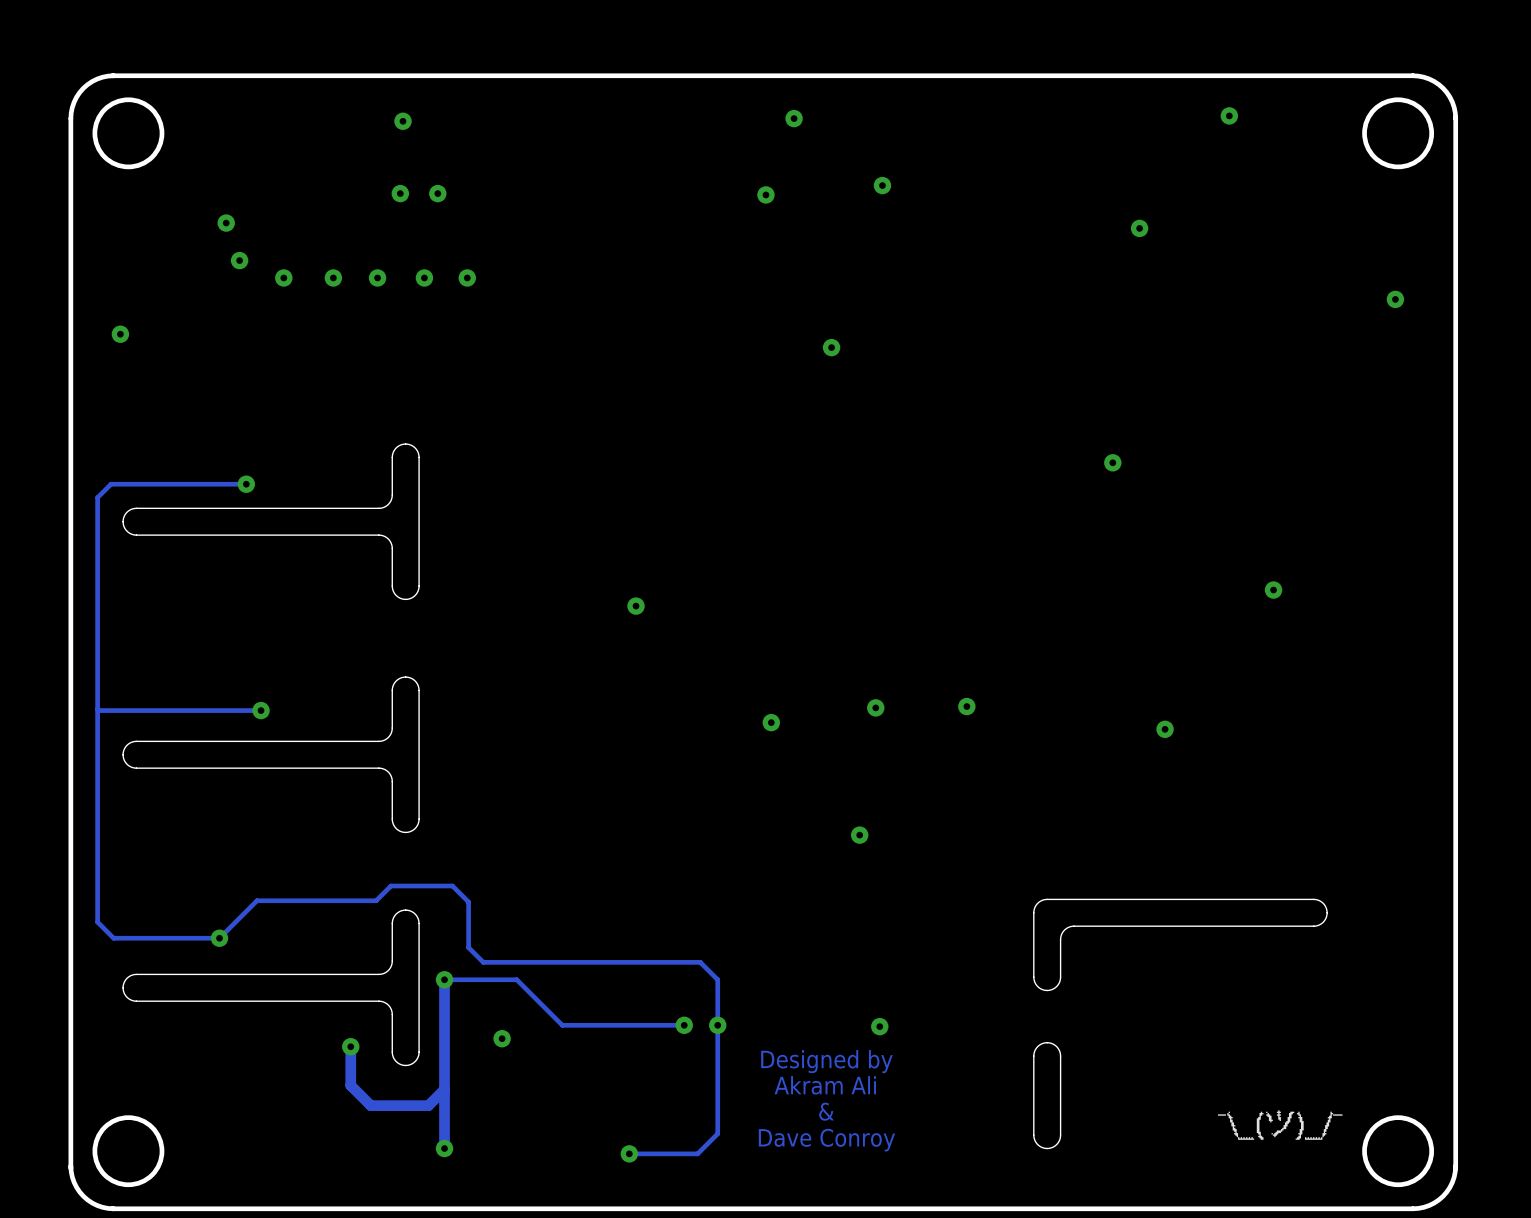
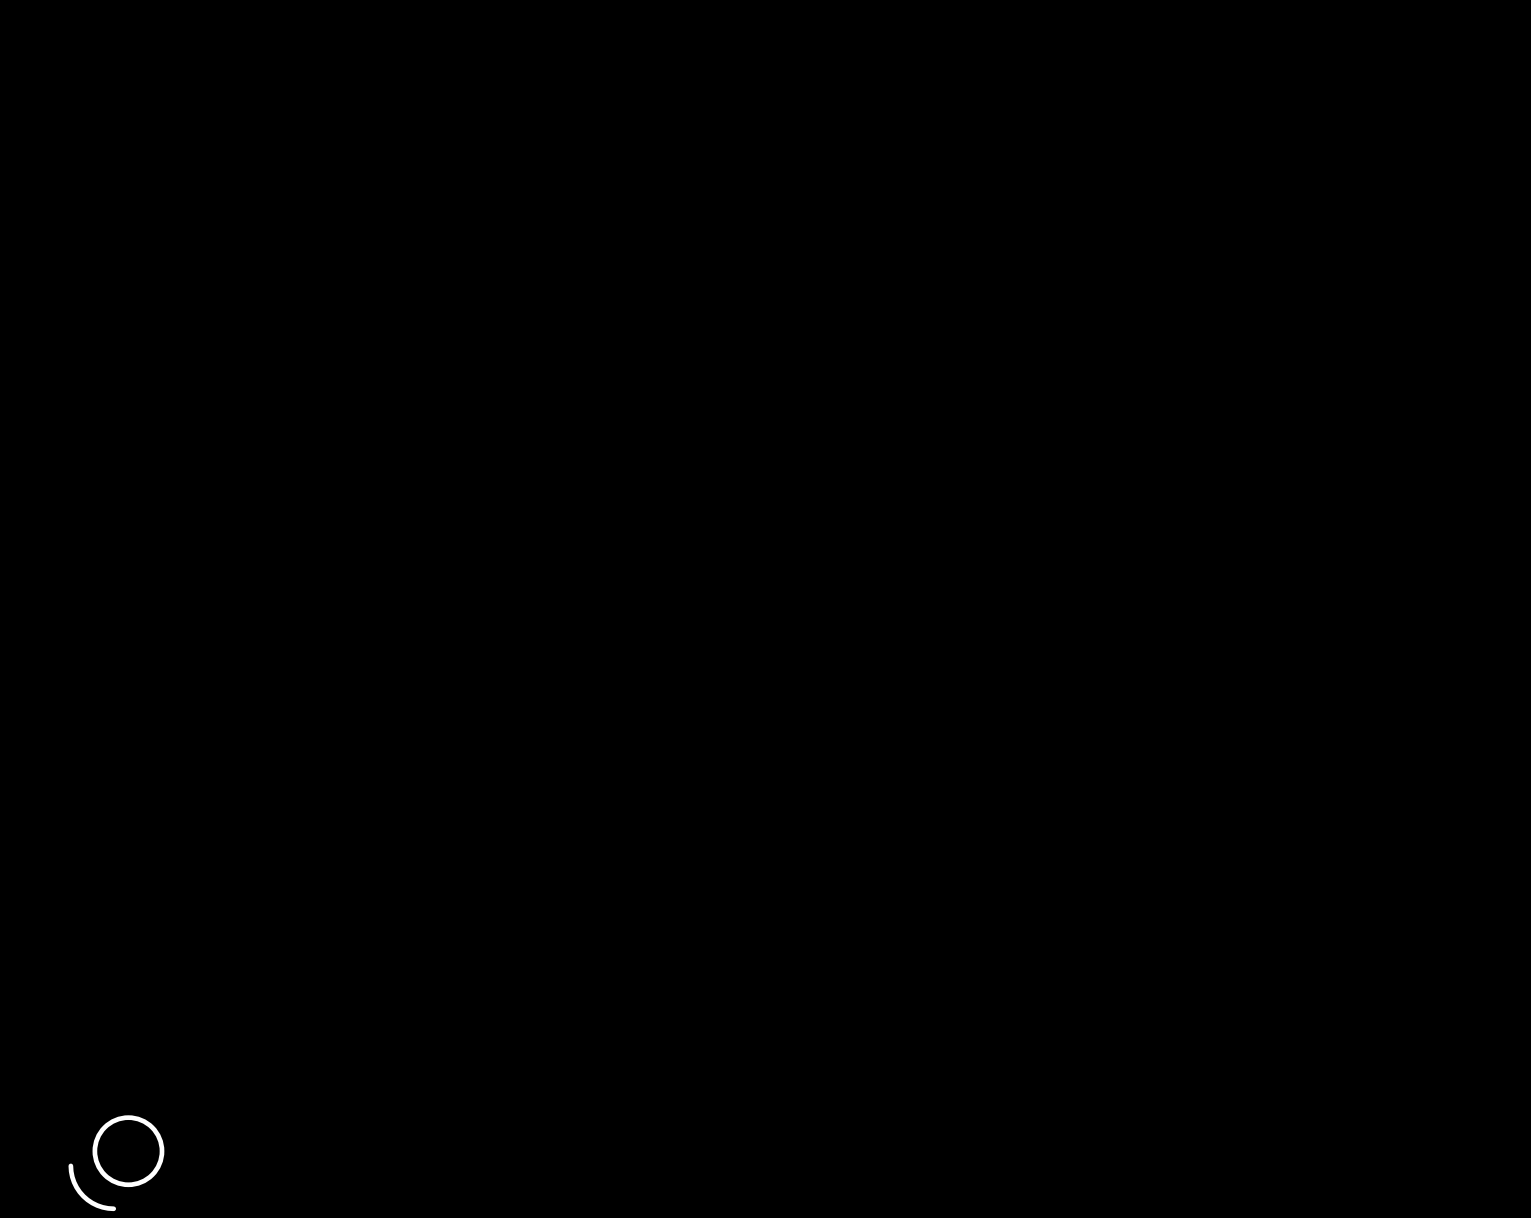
board edge: (112, 75) (1412, 75) (1429, 79) (1443, 88) (1452, 102) (1455, 118) -> none
board edge: (113, 75) (97, 79) (83, 88) (74, 102) (70, 118) (70, 1168) -> none
round board edge: [92, 97, 165, 170] -> none
round board edge: [1362, 97, 1435, 170] -> none
via: (1229, 115) -> none
board edge: (1455, 117) (1455, 1168) -> none
via: (794, 118) -> none
via: (403, 121) -> none
via: (882, 185) -> none
via: (400, 193) -> none
via: (437, 193) -> none
via: (765, 194) -> none
via: (226, 223) -> none
via: (1139, 228) -> none
via: (239, 260) -> none
via: (283, 277) -> none
via: (333, 277) -> none
via: (377, 277) -> none
via: (424, 277) -> none
via: (467, 277) -> none
via: (1395, 299) -> none
via: (120, 334) -> none
via: (831, 347) -> none
board edge: (405, 444) (415, 447) (419, 457) (418, 587) (416, 594) (409, 598) (400, 598) (393, 591) (392, 546) (389, 540) (382, 535) (136, 535) (128, 532) (123, 525) (125, 513) (134, 508) (382, 507) (389, 503) (392, 496) (393, 452) (397, 446) (405, 444) -> none
via: (1112, 462) -> none
track: (246, 484) (111, 484) (97, 497) (97, 922) (113, 938) (219, 938) (257, 900) (376, 900) (390, 886) (452, 886) (468, 902) (468, 947) (483, 962) (700, 962) (717, 979) (717, 1133) (697, 1153) (629, 1153) -> none
via: (246, 484) -> none
via: (1273, 590) -> none
via: (636, 606) -> none
board edge: (405, 677) (415, 681) (419, 690) (418, 820) (416, 827) (409, 831) (400, 831) (393, 824) (392, 779) (389, 773) (382, 768) (136, 768) (128, 765) (123, 758) (125, 746) (134, 741) (382, 740) (389, 736) (392, 729) (393, 685) (397, 679) (405, 677) -> none
via: (966, 706) -> none
via: (875, 707) -> none
track: (97, 709) (261, 710) -> none
via: (261, 710) -> none
via: (771, 722) -> none
via: (1165, 729) -> none
via: (859, 835) -> none
board edge: (1313, 899) (1043, 899) (1036, 904) (1033, 911) (1034, 980) (1039, 987) (1045, 990) (1052, 989) (1057, 985) (1060, 978) (1061, 936) (1064, 930) (1070, 926) (1315, 926) (1324, 920) (1327, 911) (1321, 902) (1313, 899) -> none
board edge: (405, 910) (415, 914) (419, 923) (418, 1053) (416, 1060) (409, 1065) (400, 1064) (393, 1057) (392, 1012) (389, 1006) (382, 1001) (136, 1001) (128, 998) (123, 991) (125, 979) (134, 974) (382, 973) (389, 969) (392, 962) (393, 918) (397, 912) (405, 910) -> none
via: (219, 938) -> none
via: (444, 979) -> none
track: (684, 1025) (562, 1025) (516, 979) (444, 979) (444, 1148) -> none
via: (684, 1025) -> none
via: (717, 1025) -> none
via: (879, 1026) -> none
via: (502, 1038) -> none
board edge: (1047, 1042) (1056, 1046) (1060, 1056) (1060, 1136) (1055, 1145) (1047, 1148) (1037, 1144) (1033, 1135) (1033, 1054) (1039, 1045) (1047, 1042) -> none
track: (350, 1046) (350, 1085) (370, 1105) (428, 1105) (444, 1089) -> none
via: (350, 1046) -> none
text: Designed by (826, 1061) -> none
text: Akram Ali (825, 1085) -> none
drawing: [1217, 1110, 1343, 1140] -> none
text: & (826, 1111) -> none
round board edge: [1362, 1115, 1435, 1188] -> none
text: Dave Conroy (826, 1140) -> none
via: (444, 1148) -> none
via: (629, 1153) -> none
board edge: (1455, 1165) (1452, 1182) (1443, 1196) (1429, 1205) (1412, 1208) (112, 1208) -> none

